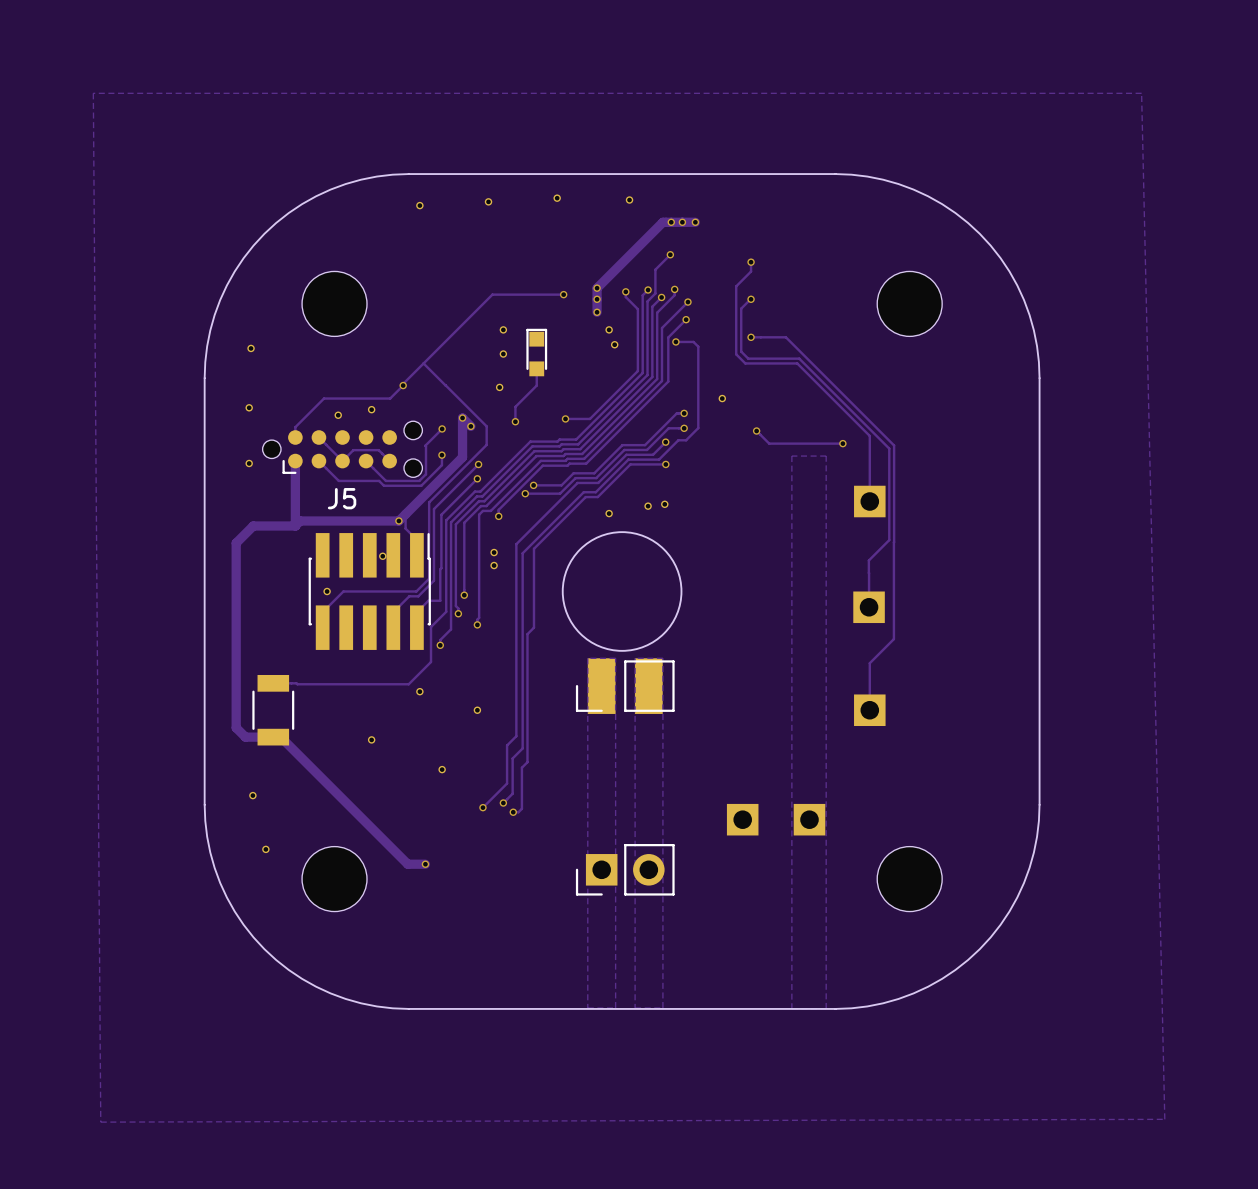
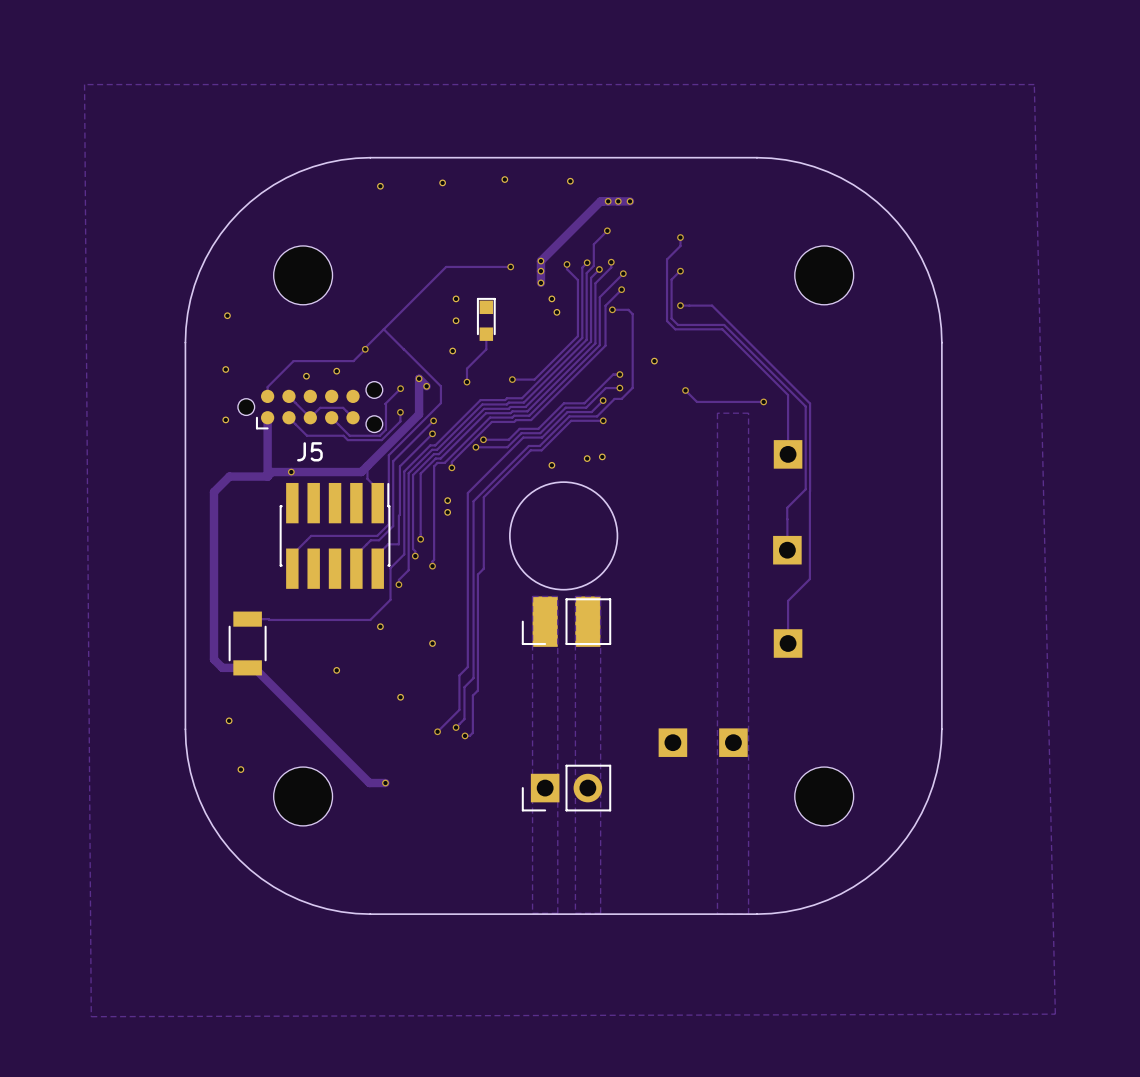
via position: (398, 520) -> (291, 472)
part: (382, 556) -> none
part: (327, 591) -> none

